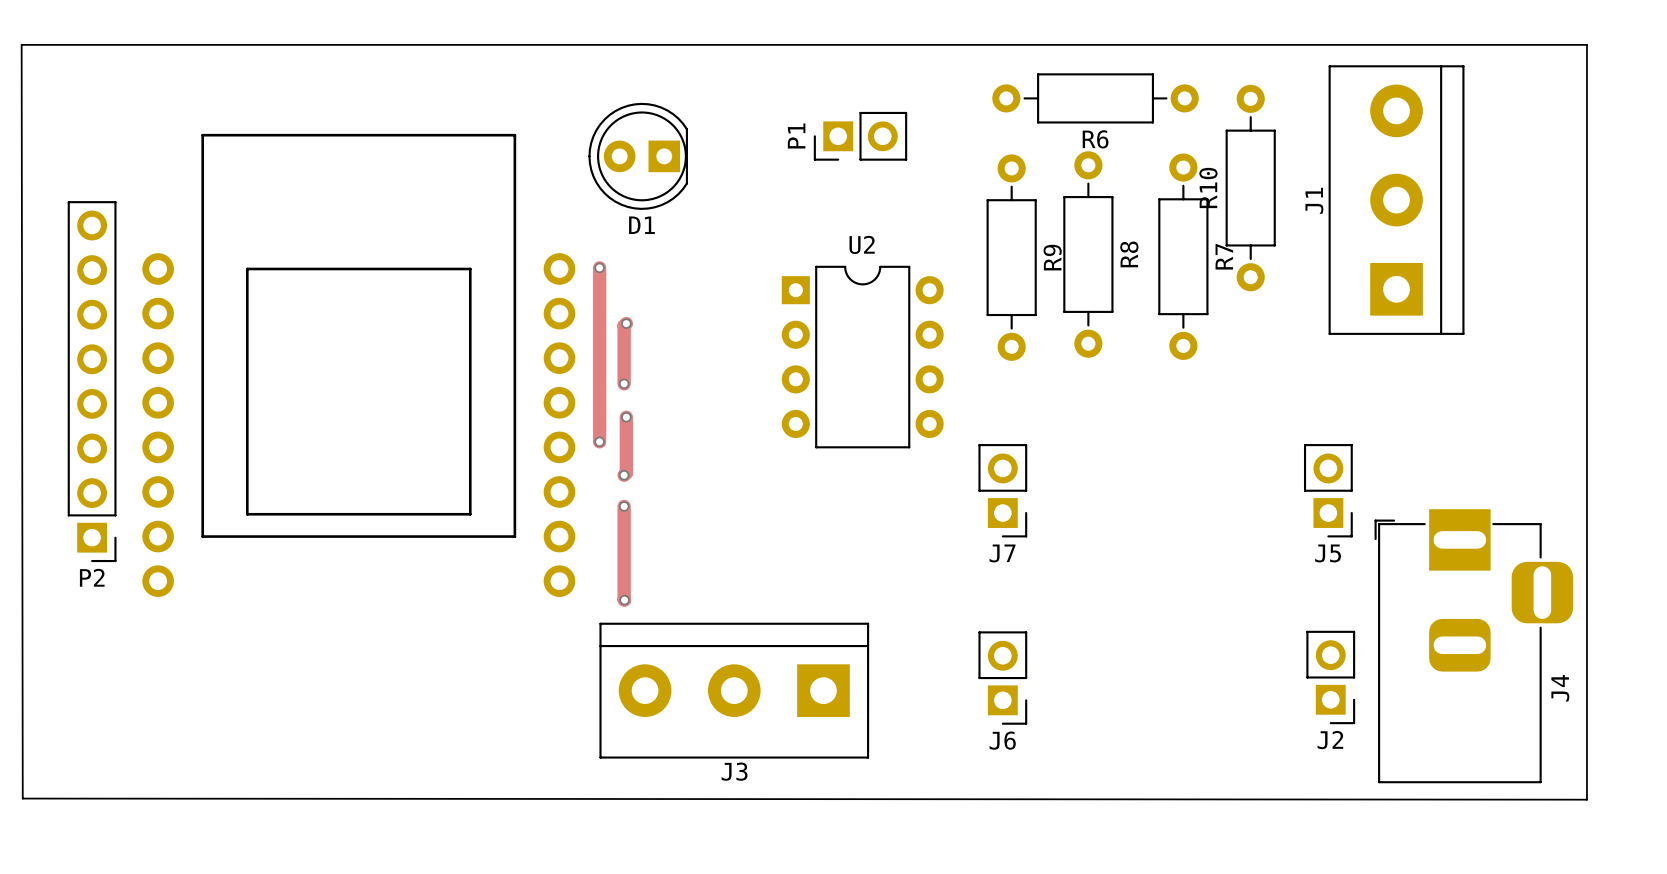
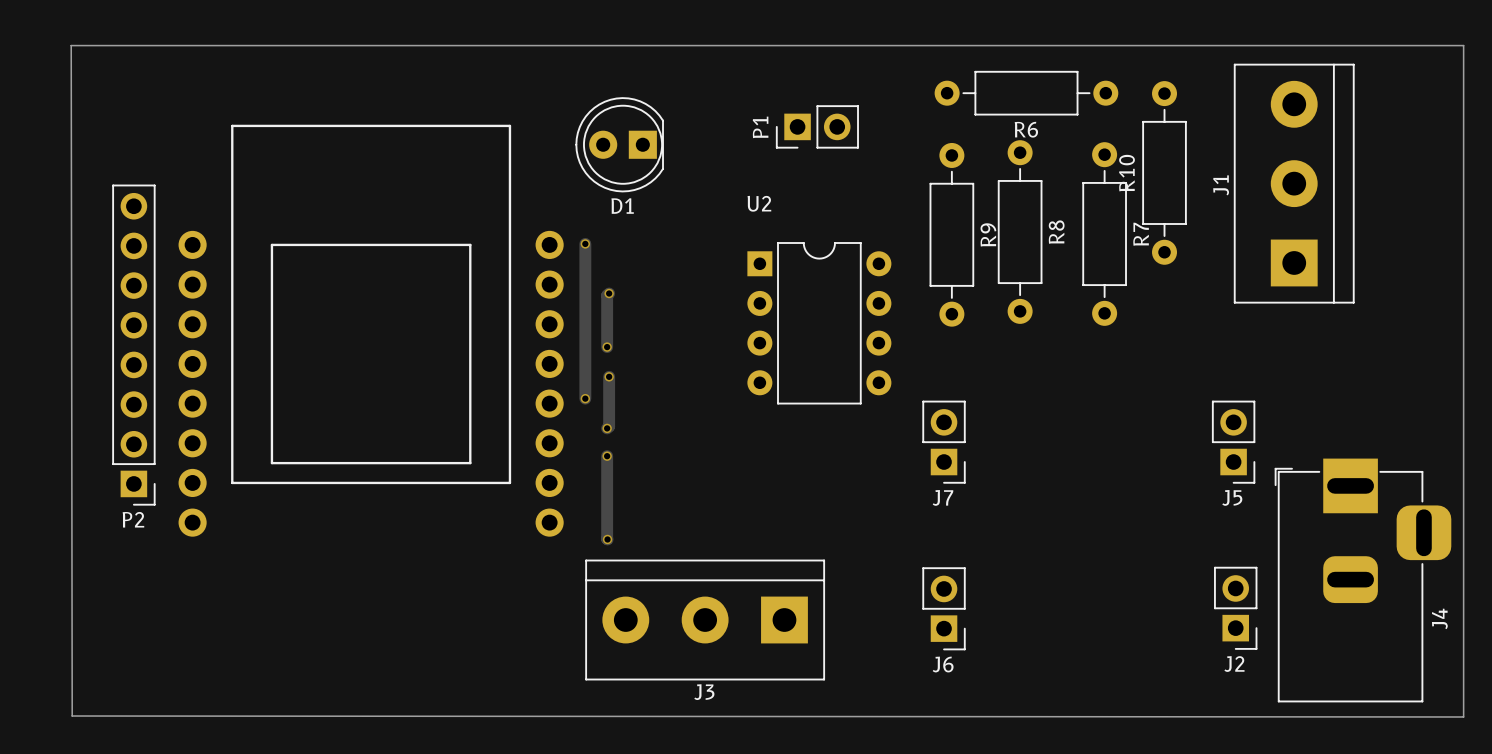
U2 name position: U2 (862, 244) -> U2 (759, 203)

